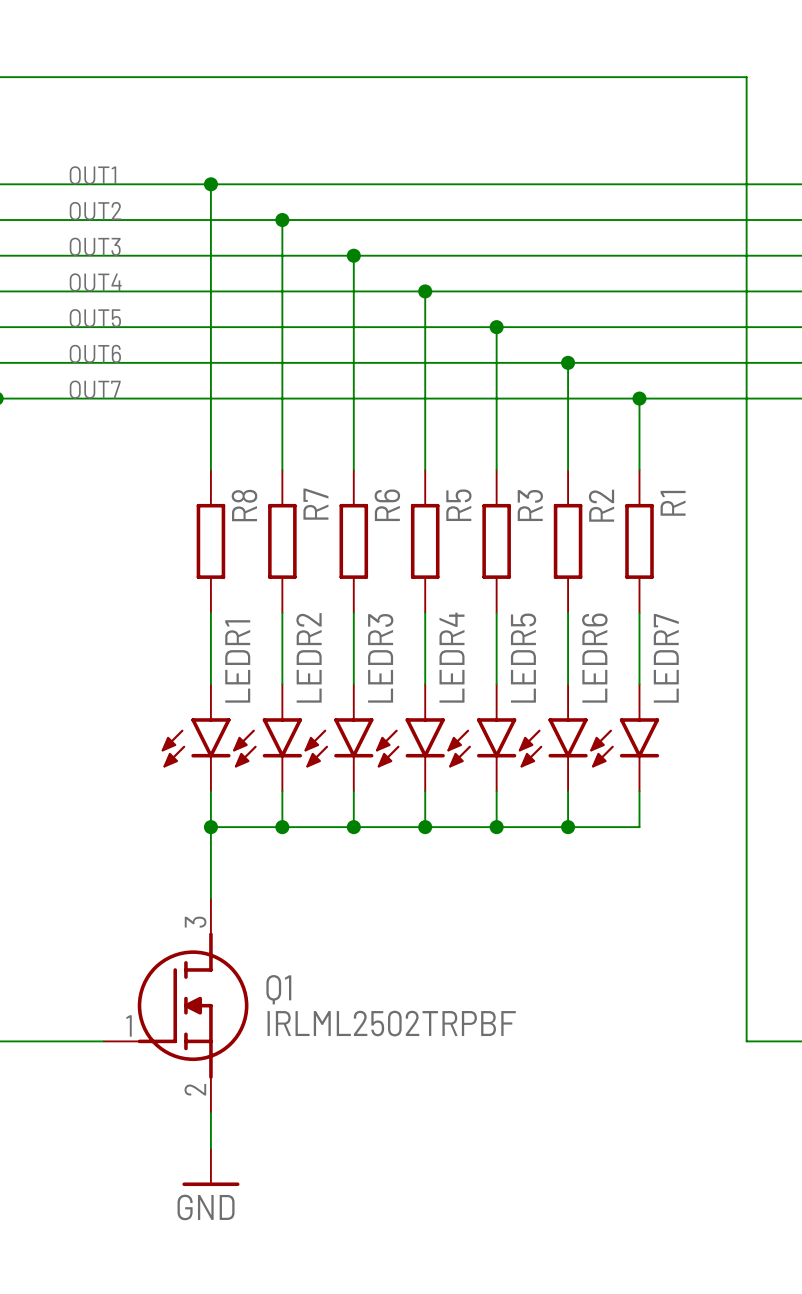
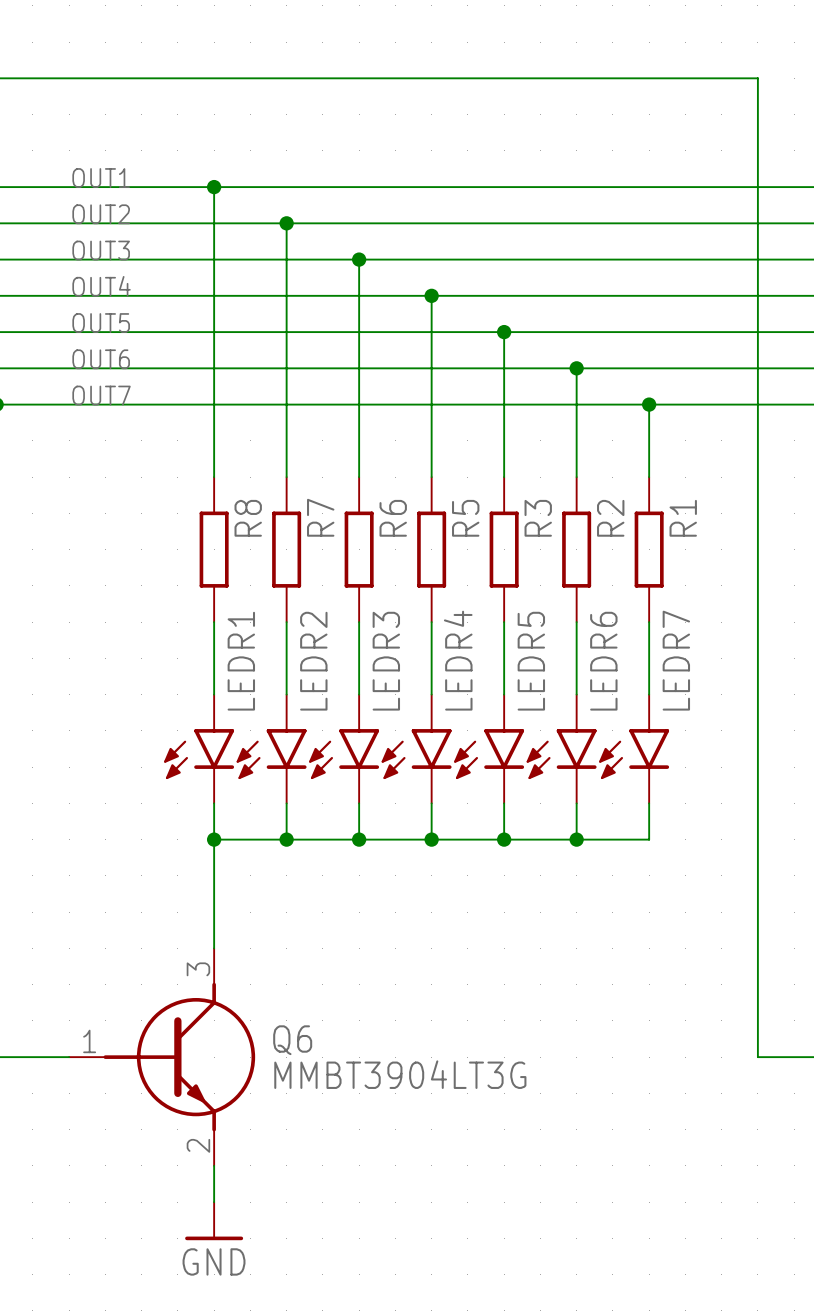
Q1: IRLML2502TRPBF (176, 1005) -> none
Q6: none -> MMBT3904LT3G (162, 1057)
power symbol position: GND (210, 1167) -> GND (214, 1221)

